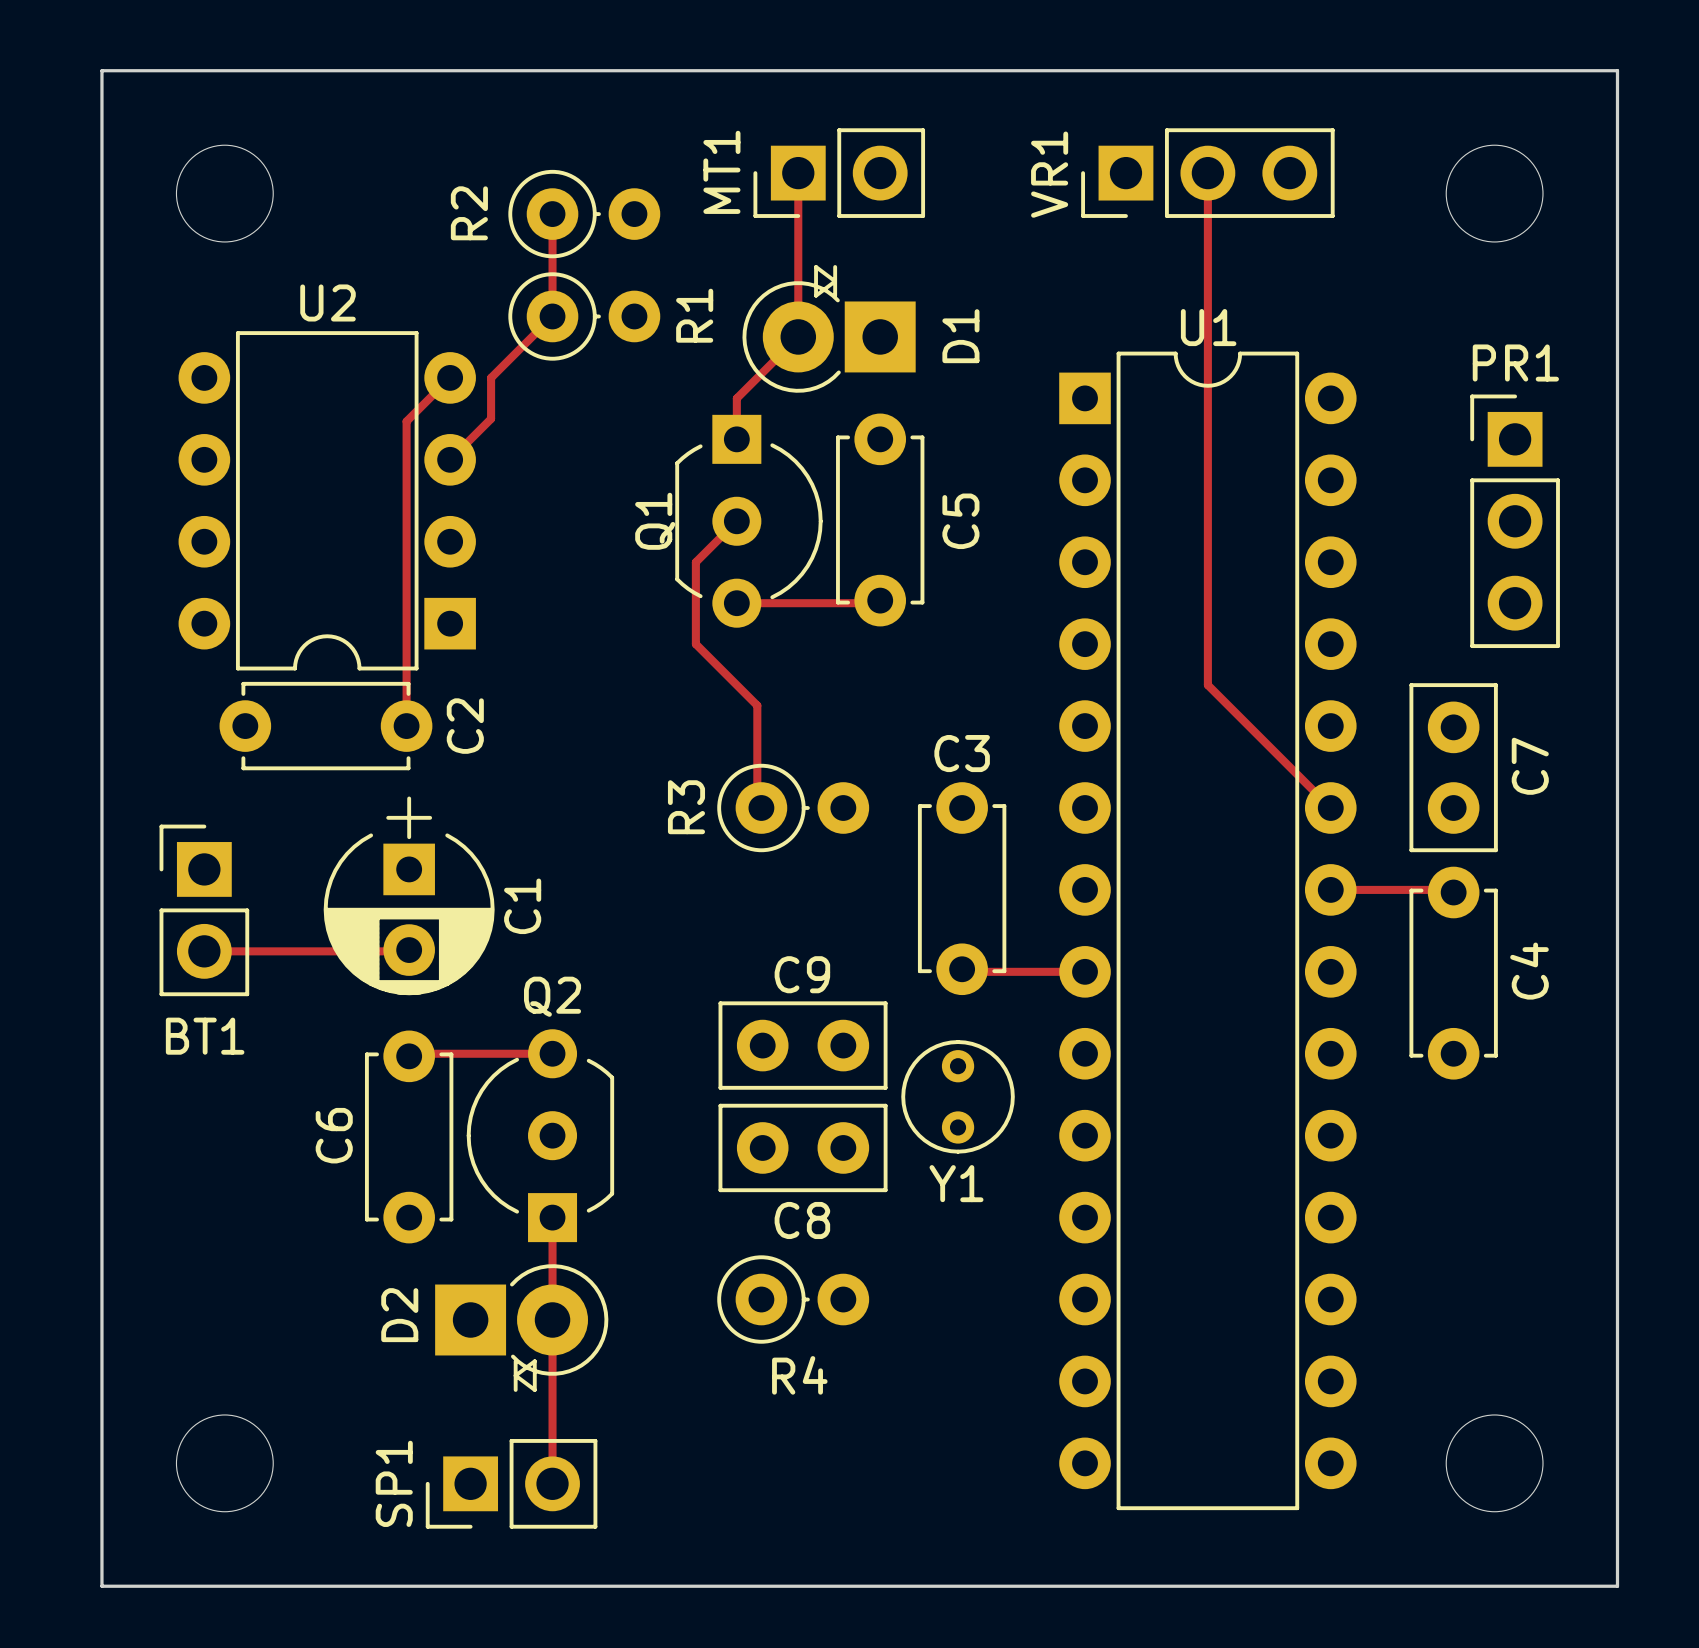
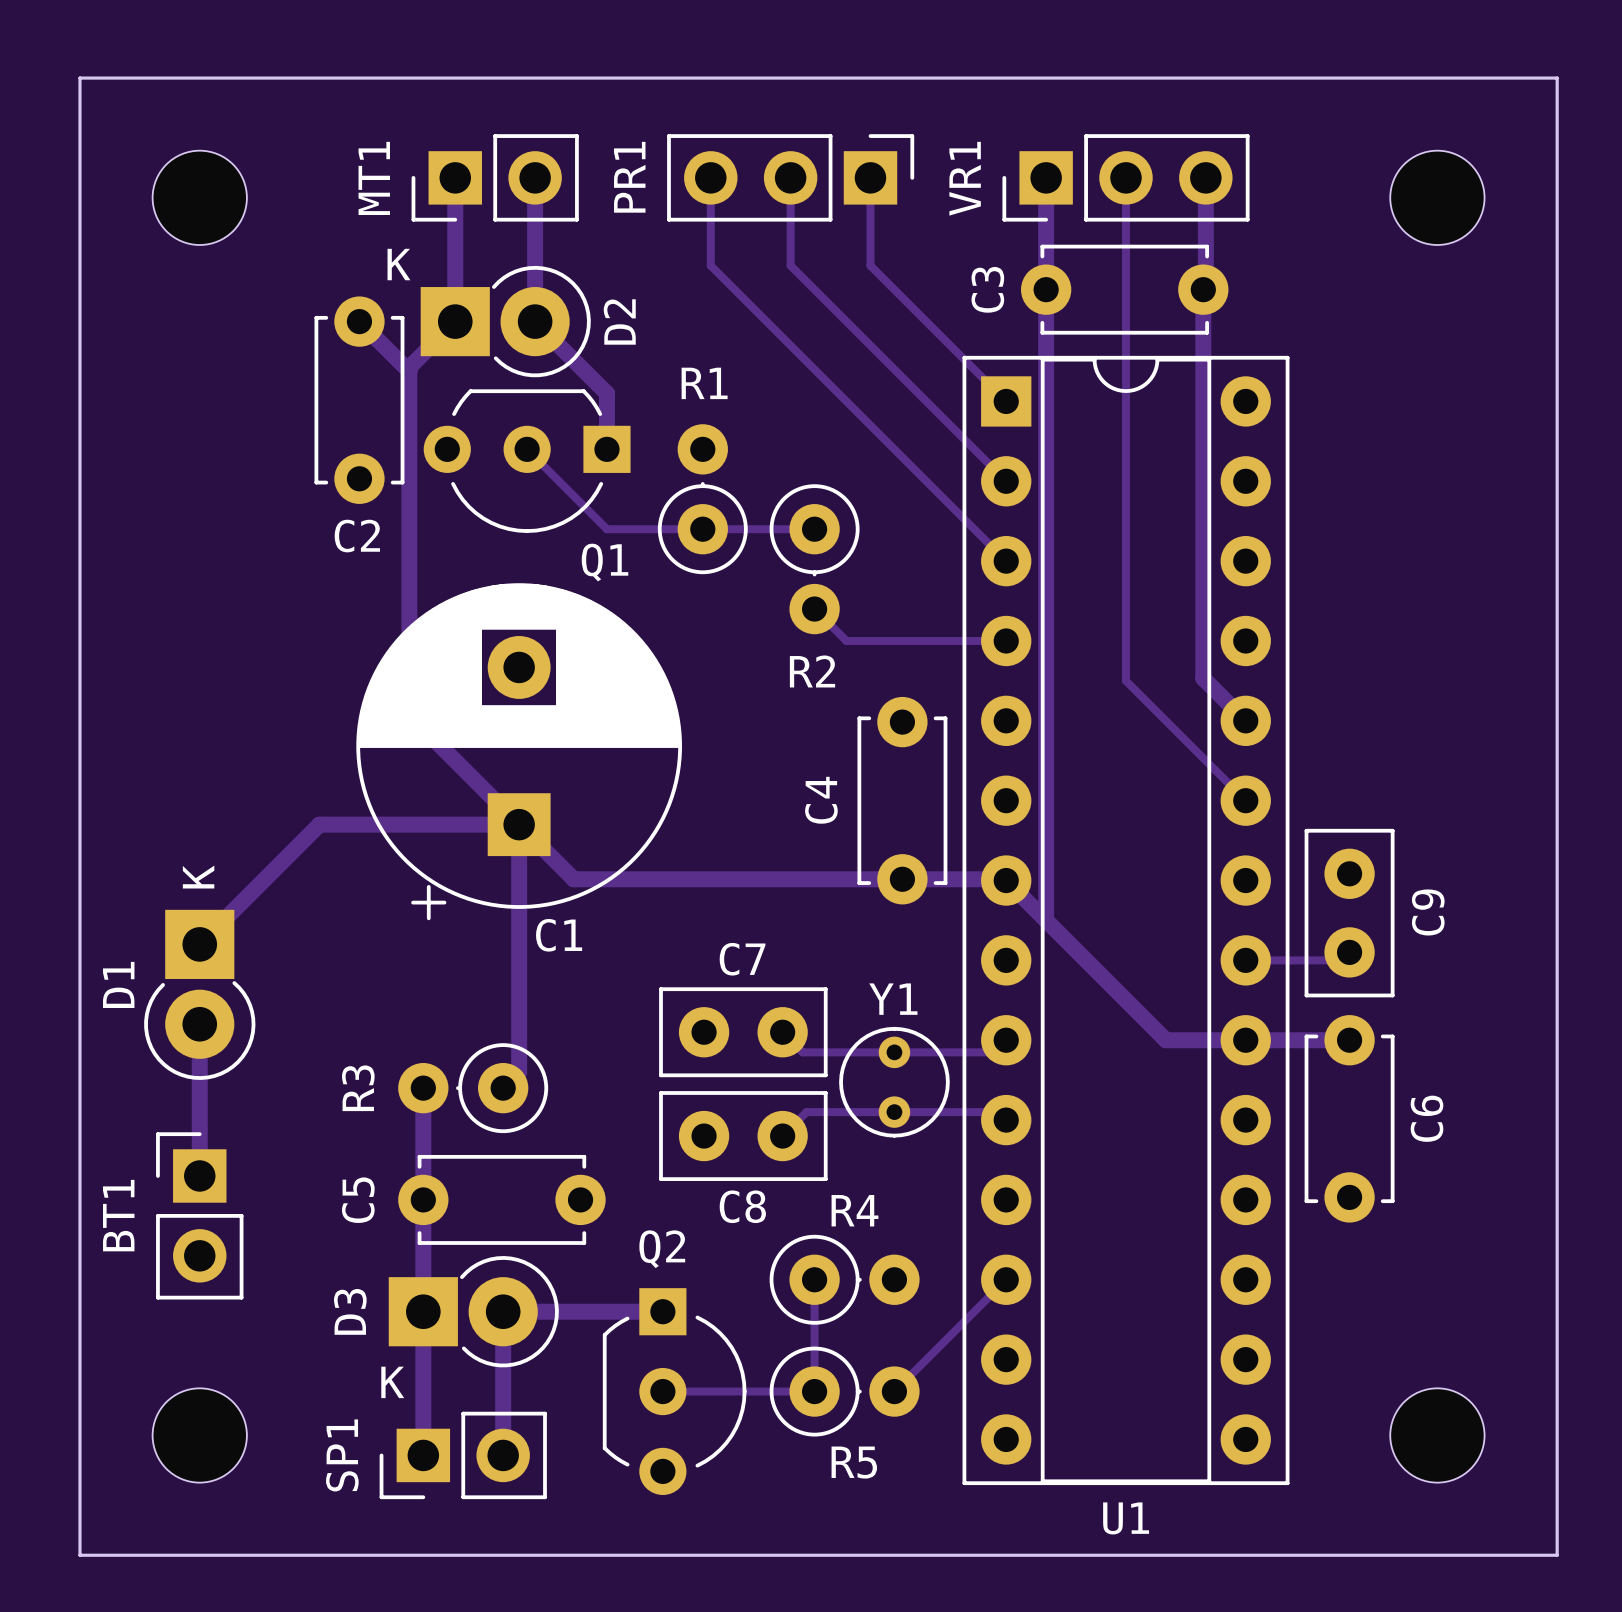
R2 footprint: [508, 169, 661, 259] -> [769, 484, 860, 635]
MT1 name position: MT1 (721, 172) -> MT1 (374, 178)
track: none -> (455, 177) (455, 321) (409, 367) (409, 714) (573, 879) (1004, 879)
track: none -> (535, 177) (535, 321) (606, 393) (606, 449)
track: none -> (710, 177) (710, 265) (1006, 561)
track: (798, 173) (798, 336) (736, 398) (736, 439) -> none
track: none -> (790, 177) (790, 265) (1006, 481)
MT1 position: (839, 173) -> (495, 177)
track: none -> (870, 177) (870, 265) (1006, 401)
track: none -> (1046, 177) (1046, 920)
track: none -> (1125, 177) (1125, 680) (1245, 800)
track: (1207, 173) (1207, 685) (1330, 807) -> none
VR1 position: (1207, 173) -> (1125, 177)
track: none -> (1205, 177) (1205, 287)
VR1 name position: VR1 (1049, 174) -> VR1 (965, 178)
R2 name position: R2 (469, 213) -> R2 (812, 671)
track: (552, 214) (552, 316) (491, 377) (491, 418) (450, 459) -> none
D1 footprint: [742, 265, 916, 393] -> [144, 909, 256, 1080]
R1 footprint: [508, 272, 661, 361] -> [657, 424, 748, 575]
track: none -> (1203, 289) (1203, 678) (1245, 720)
R1 name position: R1 (694, 315) -> R1 (704, 383)
track: none -> (359, 321) (409, 371)
U1 name position: U1 (1208, 327) -> U1 (1126, 1518)
D1 name position: D1 (960, 336) -> D1 (118, 984)
U1 footprint: [1059, 351, 1357, 1511] -> [962, 355, 1290, 1486]
PR1 name position: PR1 (1515, 363) -> PR1 (629, 177)
track: (450, 377) (406, 421) (406, 726) -> none
C5 footprint: [836, 413, 925, 627] -> [398, 1154, 606, 1245]
Q1 footprint: [675, 414, 823, 628] -> [423, 389, 631, 533]
track: none -> (527, 449) (606, 529) (814, 529)
U2: (327, 500) -> none
Q1 name position: Q1 (655, 521) -> Q1 (605, 562)
track: (736, 521) (695, 562) (695, 644) (757, 705) (757, 807) -> none
C5 name position: C5 (960, 521) -> C5 (358, 1200)
PR1 rotation: 0° (1515, 521) -> 90° clockwise (790, 177)
PR1 position: (1515, 521) -> (790, 177)
track: (736, 603) (877, 603) -> none
track: none -> (814, 609) (846, 640) (1006, 640)
C2 footprint: [219, 681, 433, 771] -> [314, 296, 405, 504]
C7 footprint: [1409, 683, 1498, 853] -> [659, 987, 828, 1078]
C2 name position: C2 (465, 726) -> C2 (357, 536)
C3 name position: C3 (962, 753) -> C3 (987, 289)
R3 footprint: [717, 763, 870, 853] -> [398, 1043, 549, 1134]
C7 name position: C7 (1530, 766) -> C7 (742, 959)
C3 footprint: [917, 782, 1007, 996] -> [1021, 244, 1229, 335]
C1 footprint: [323, 796, 495, 996] -> [356, 583, 682, 921]
C4 footprint: [1409, 866, 1498, 1080] -> [857, 696, 948, 905]
track: (1330, 889) (1451, 889) -> none
track: none -> (1006, 880) (1165, 1040) (1349, 1040)
C1 name position: C1 (522, 906) -> C1 (559, 935)
BT1 position: (204, 910) -> (199, 1215)
track: (204, 951) (407, 951) -> none
track: none -> (199, 944) (319, 824) (519, 824) (519, 1072) (503, 1088)
track: (964, 971) (1085, 971) -> none
C4 name position: C4 (1529, 971) -> C4 (821, 800)
C9 name position: C9 (802, 974) -> C9 (1428, 912)
track: none -> (1245, 960) (1341, 960)
C9 footprint: [718, 1001, 888, 1090] -> [1304, 828, 1395, 998]
Q2 footprint: [466, 1029, 615, 1243] -> [602, 1288, 747, 1495]
C6 footprint: [364, 1030, 454, 1244] -> [1304, 1015, 1395, 1223]
BT1 name rotation: 0° (205, 1036) -> 90° counterclockwise (118, 1215)
BT1 name position: BT1 (205, 1036) -> BT1 (118, 1215)
track: none -> (199, 1024) (199, 1175)
track: none -> (782, 1032) (802, 1052) (994, 1052)
track: (411, 1053) (552, 1053) -> none
Y1 position: (958, 1096) -> (894, 1082)
C8 footprint: [718, 1103, 888, 1193] -> [659, 1091, 828, 1182]
track: none -> (423, 1088) (423, 1455)
track: none -> (998, 1112) (806, 1112) (782, 1136)
C6 name position: C6 (334, 1135) -> C6 (1427, 1118)
Y1 name position: Y1 (956, 1183) -> Y1 (893, 999)
track: (552, 1217) (552, 1483) -> none
C8 name position: C8 (802, 1220) -> C8 (742, 1206)
R4 footprint: [717, 1255, 870, 1344] -> [769, 1234, 920, 1325]
D2 footprint: [435, 1264, 609, 1392] -> [420, 265, 591, 378]
track: none -> (814, 1279) (814, 1391) (662, 1391)
track: none -> (1006, 1279) (894, 1391)
D2 name position: D2 (399, 1315) -> D2 (619, 321)
D3: none -> (473, 1311)
track: none -> (662, 1311) (503, 1311) (503, 1455)
R4 name position: R4 (799, 1375) -> R4 (854, 1210)
R5: none -> (844, 1391)
SP1 name position: SP1 (394, 1483) -> SP1 (342, 1455)
SP1 position: (511, 1483) -> (463, 1455)

